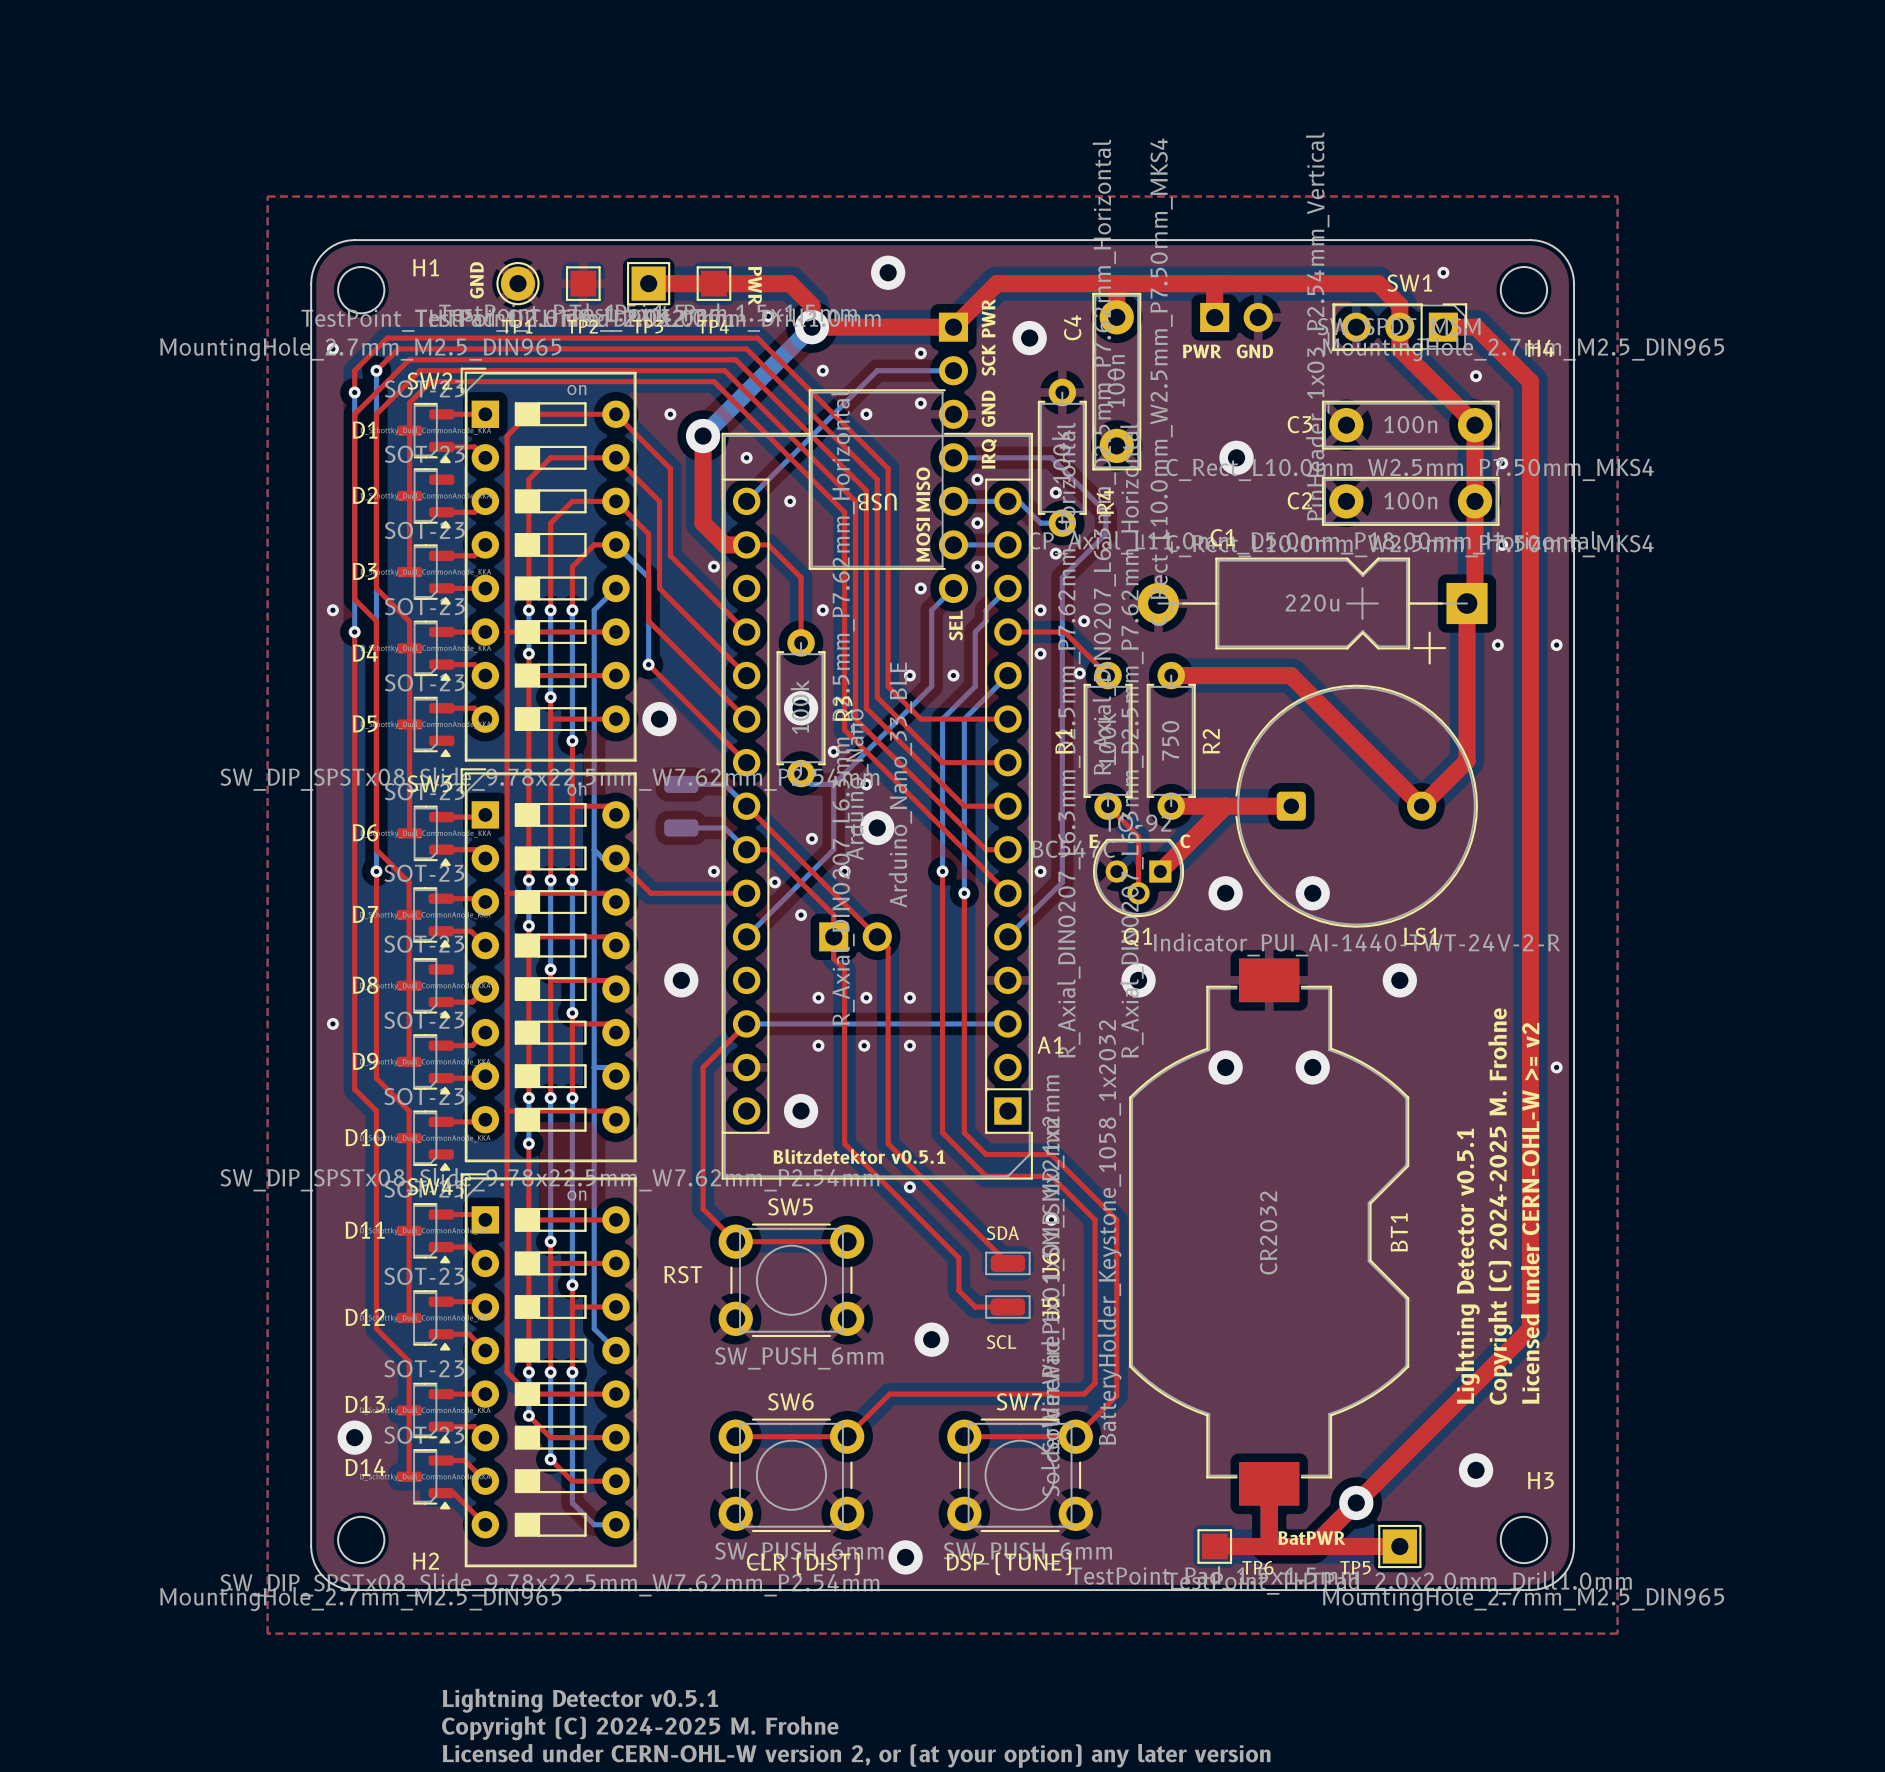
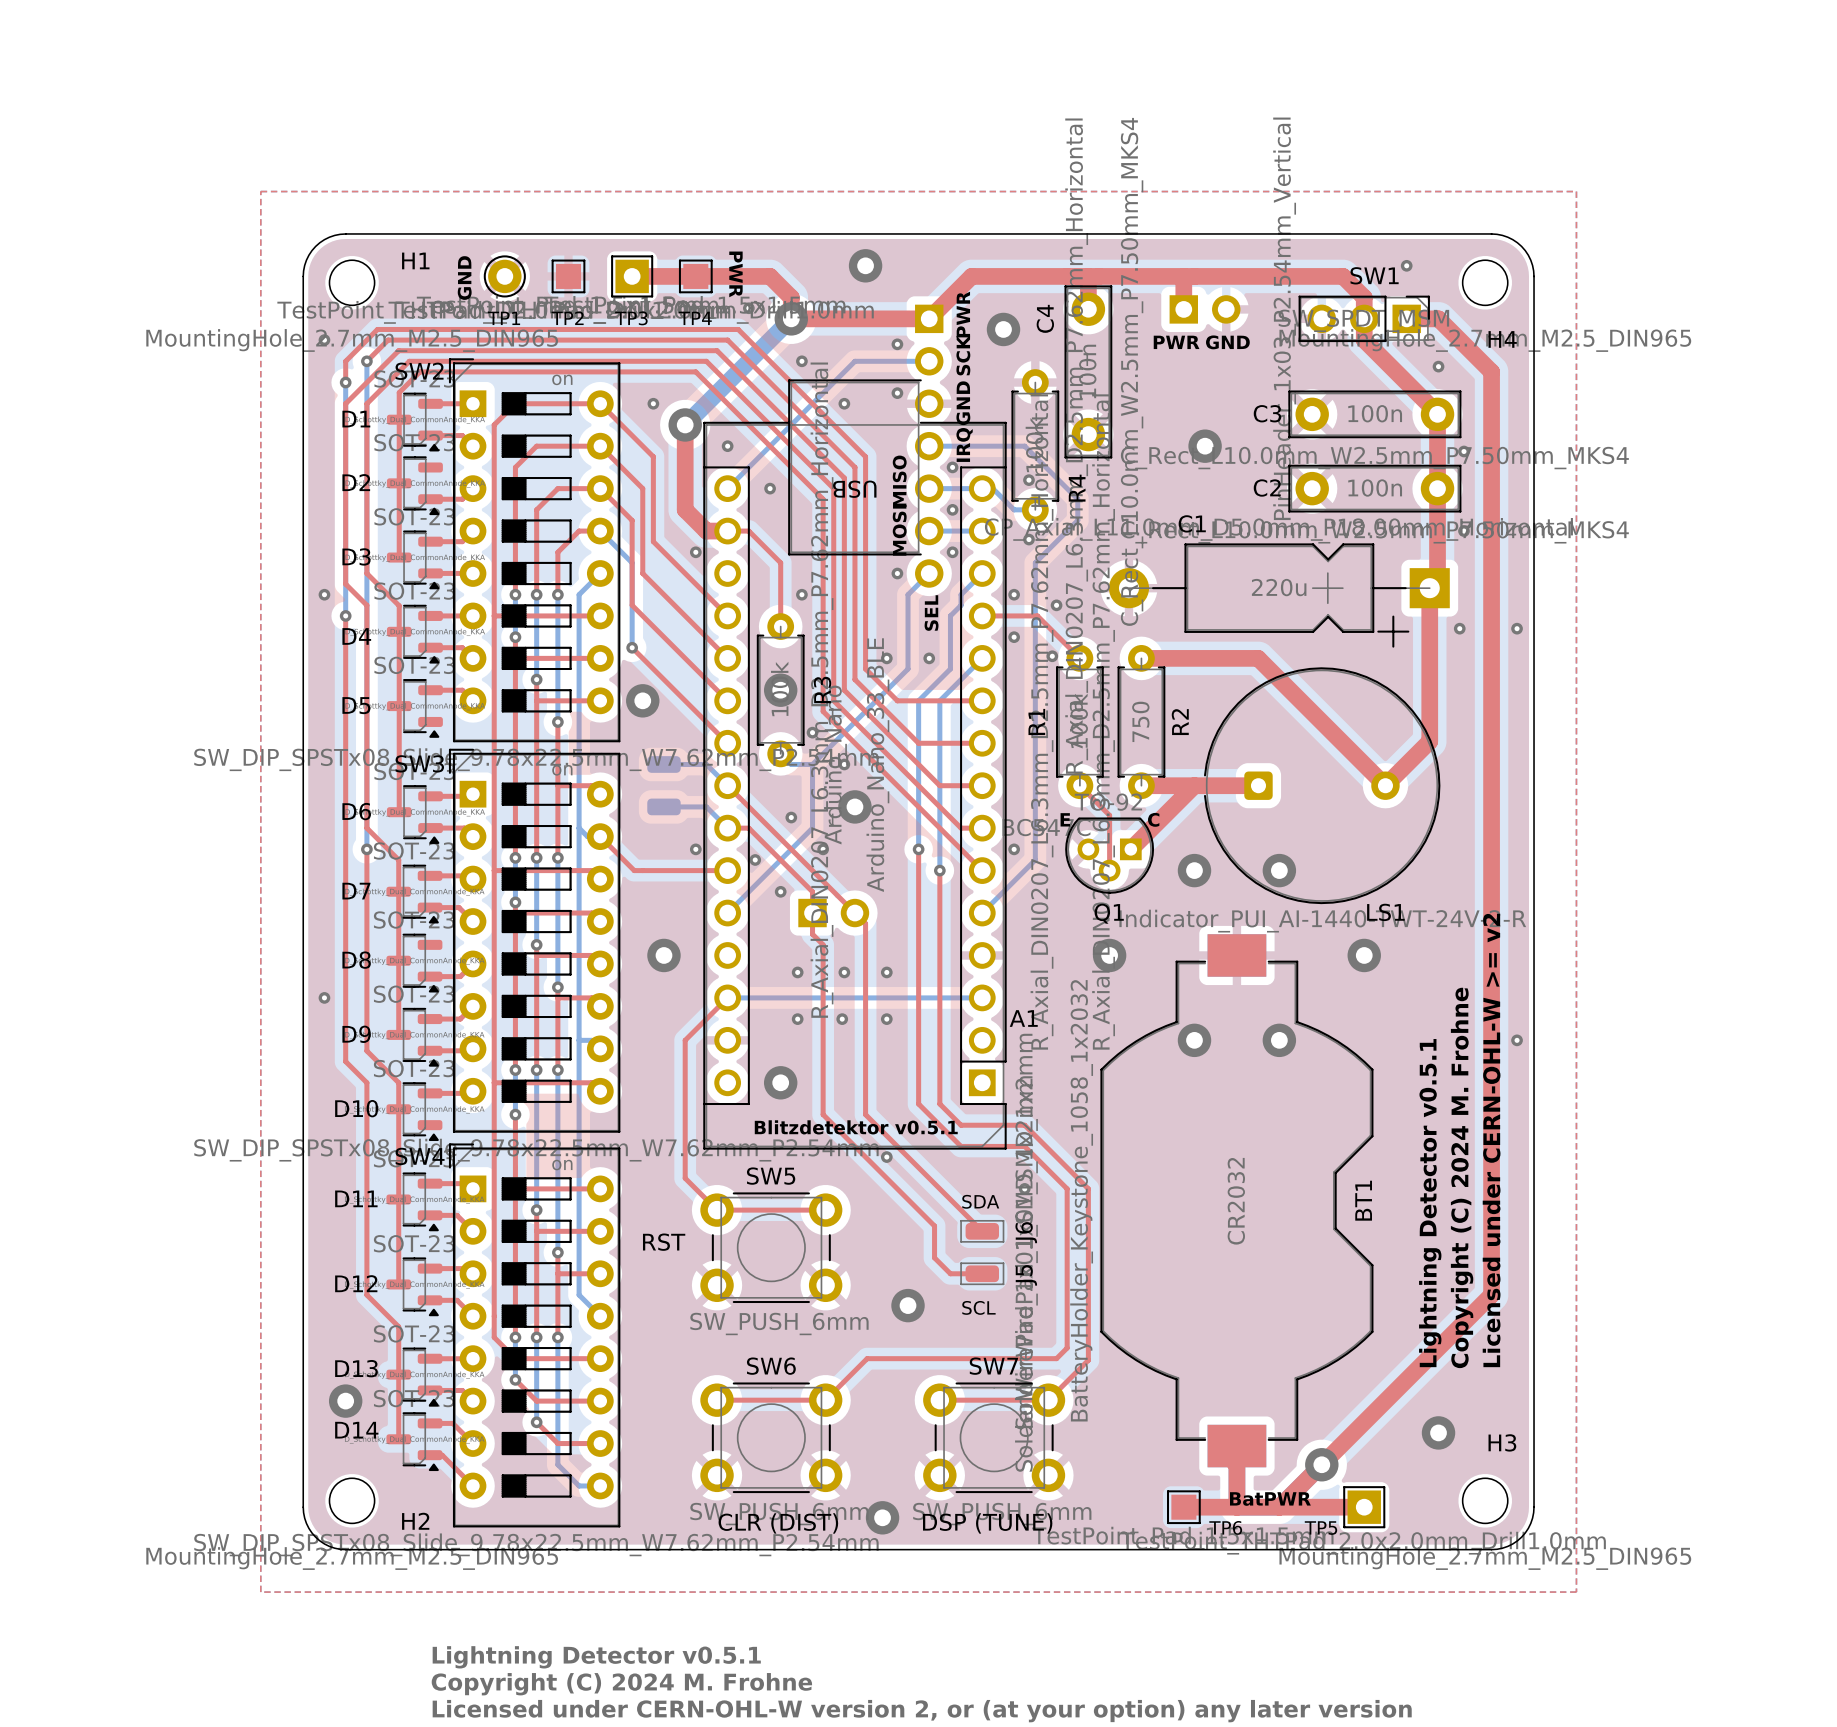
text: Copyright (C) 2024-2025 M. Frohne (1500, 1206) -> Copyright (C) 2024 M. Frohne (1462, 1177)
text: Copyright (C) 2024-2025 M. Frohne (640, 1728) -> Copyright (C) 2024 M. Frohne (621, 1684)

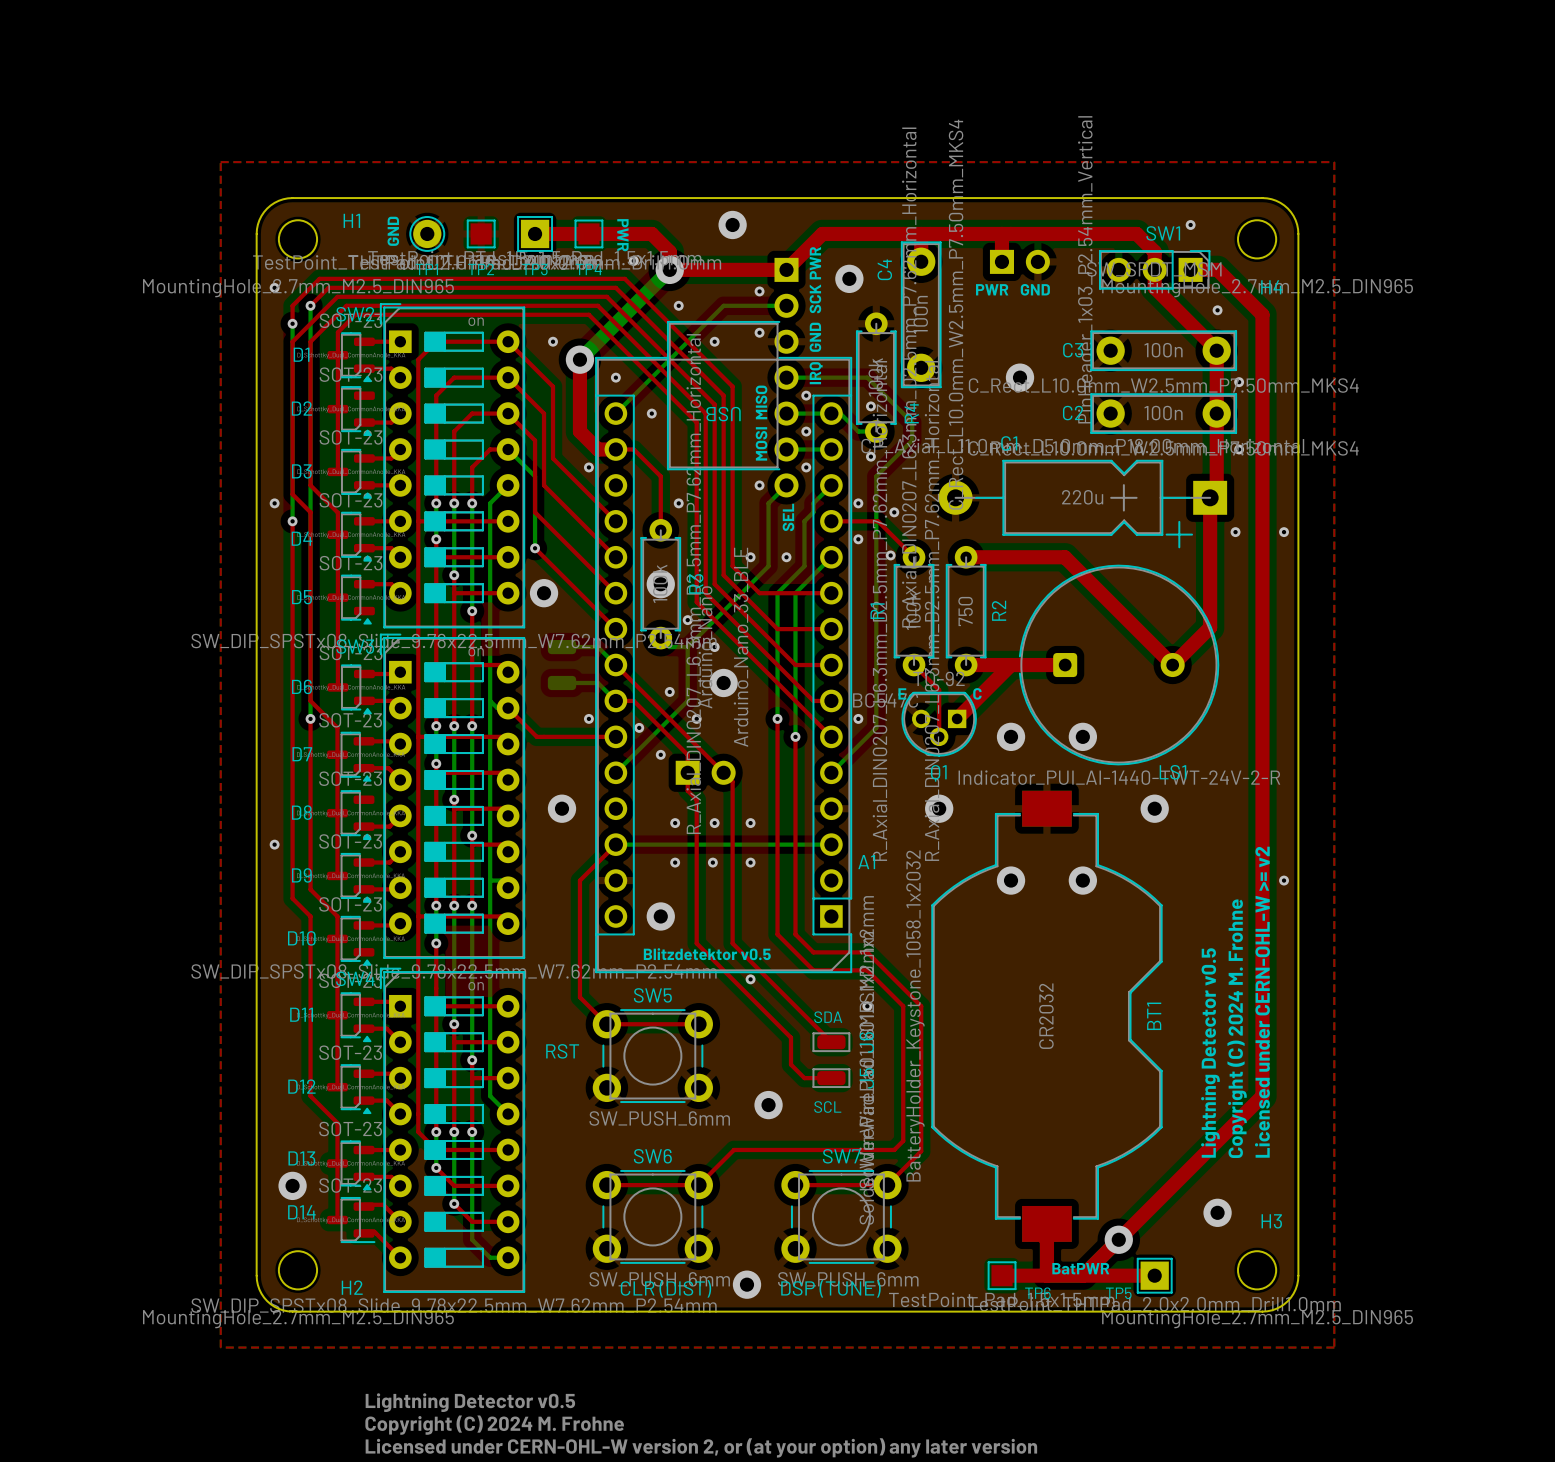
text: Blitzdetektor v0.5.1 (856, 1127) -> Blitzdetektor v0.5 (707, 954)
text: Lightning Detector v0.5.1 (1430, 1203) -> Lightning Detector v0.5 (1210, 1052)
D14 footprint: [386, 1412, 443, 1472] -> [327, 1197, 376, 1243]
text: Lightning Detector v0.5.1 (596, 1657) -> Lightning Detector v0.5 (470, 1402)

